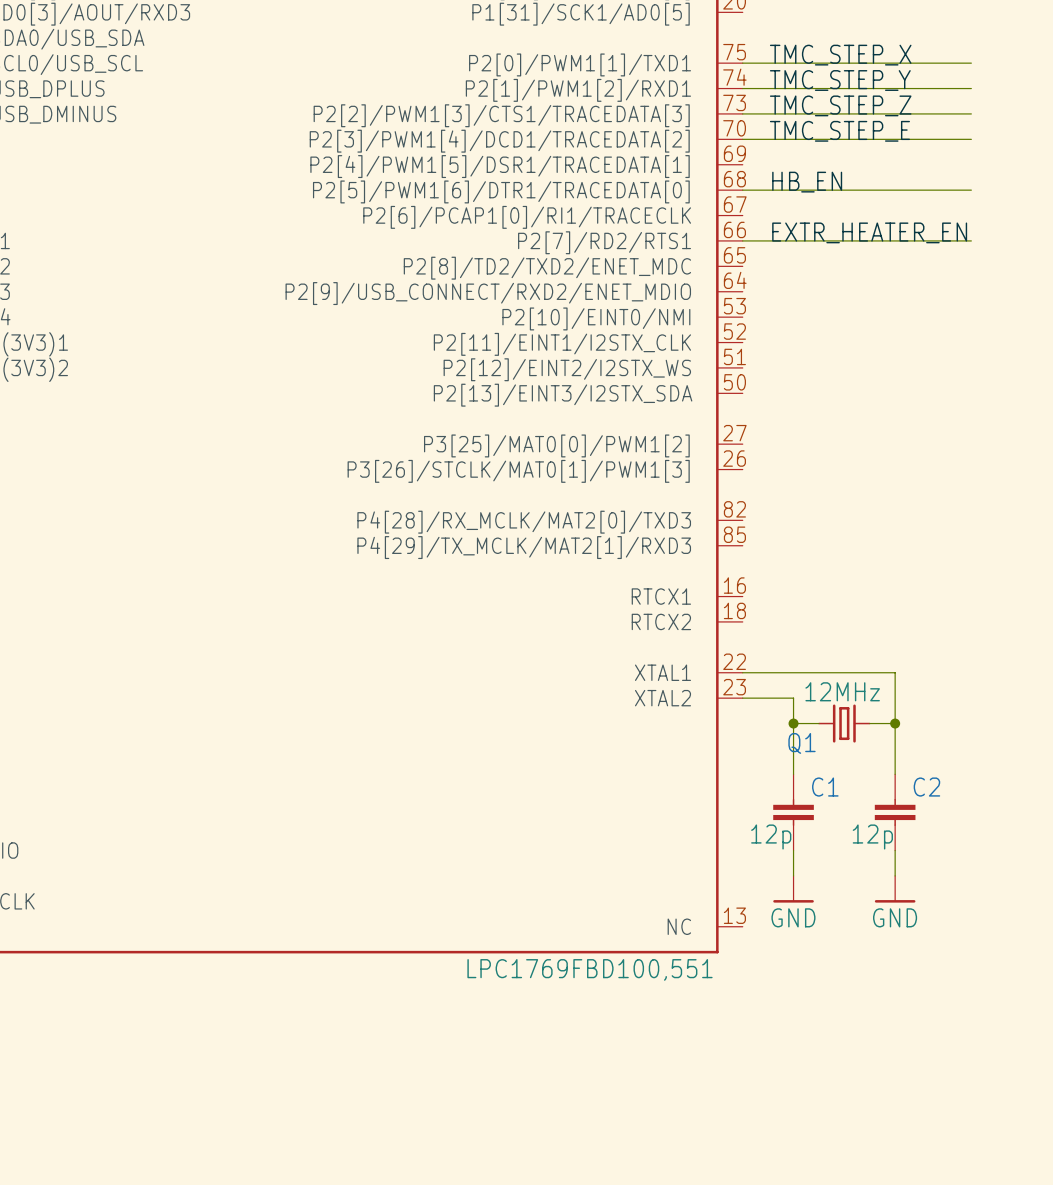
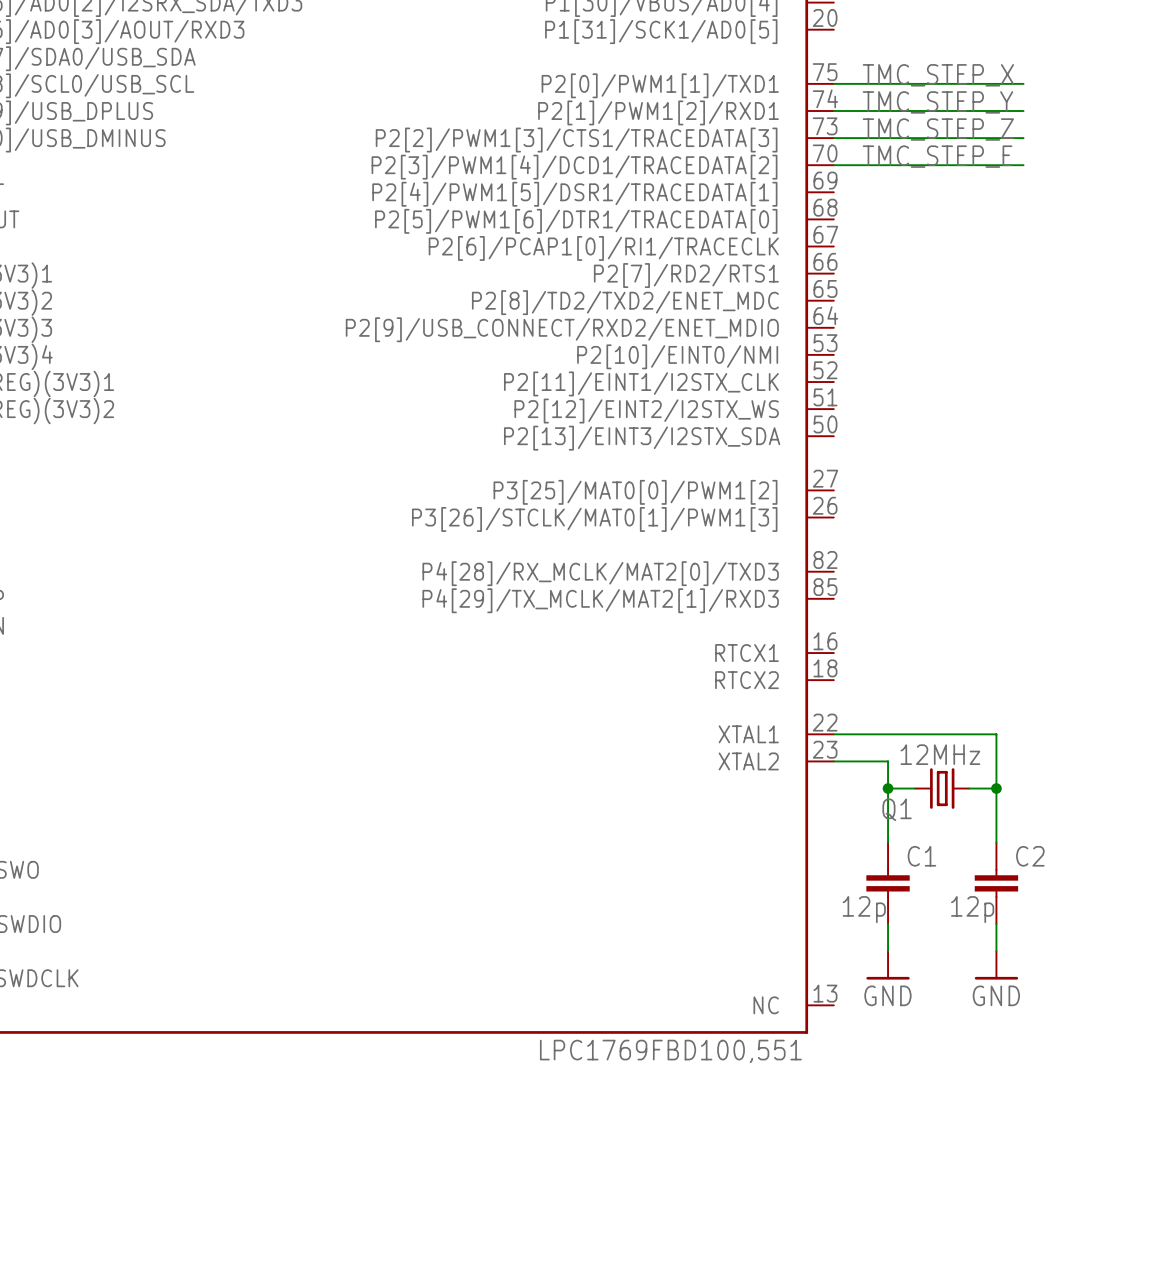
wire: (920, 63) (971, 63) -> none
wire: (920, 88) (971, 88) -> none
wire: (920, 113) (971, 113) -> none
wire: (920, 139) (971, 139) -> none
label: HB_EN (807, 182) -> none
wire: (742, 190) (971, 190) -> none
label: EXTR_HEATER_EN (869, 232) -> none
wire: (742, 240) (971, 240) -> none

